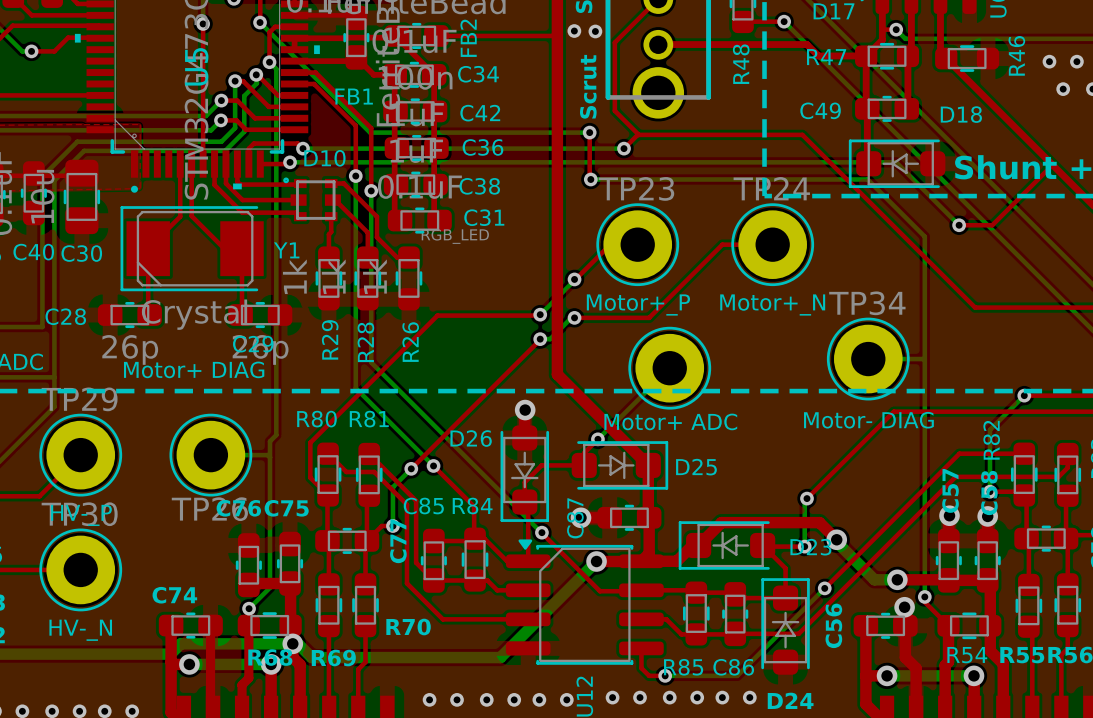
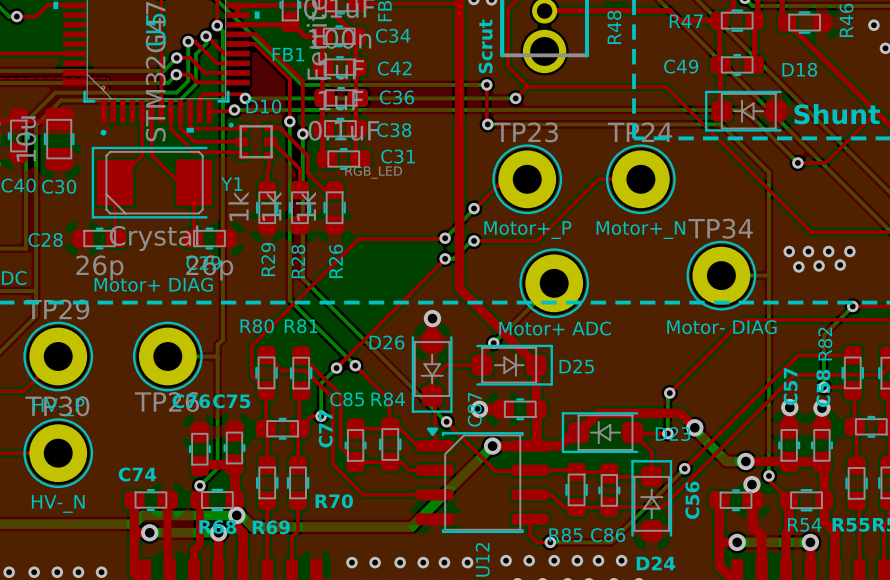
via: none -> (789, 251)
via: none -> (808, 251)
via: none -> (828, 251)
via: none -> (849, 251)
via: none -> (840, 265)
via: none -> (819, 265)
via: none -> (798, 266)

